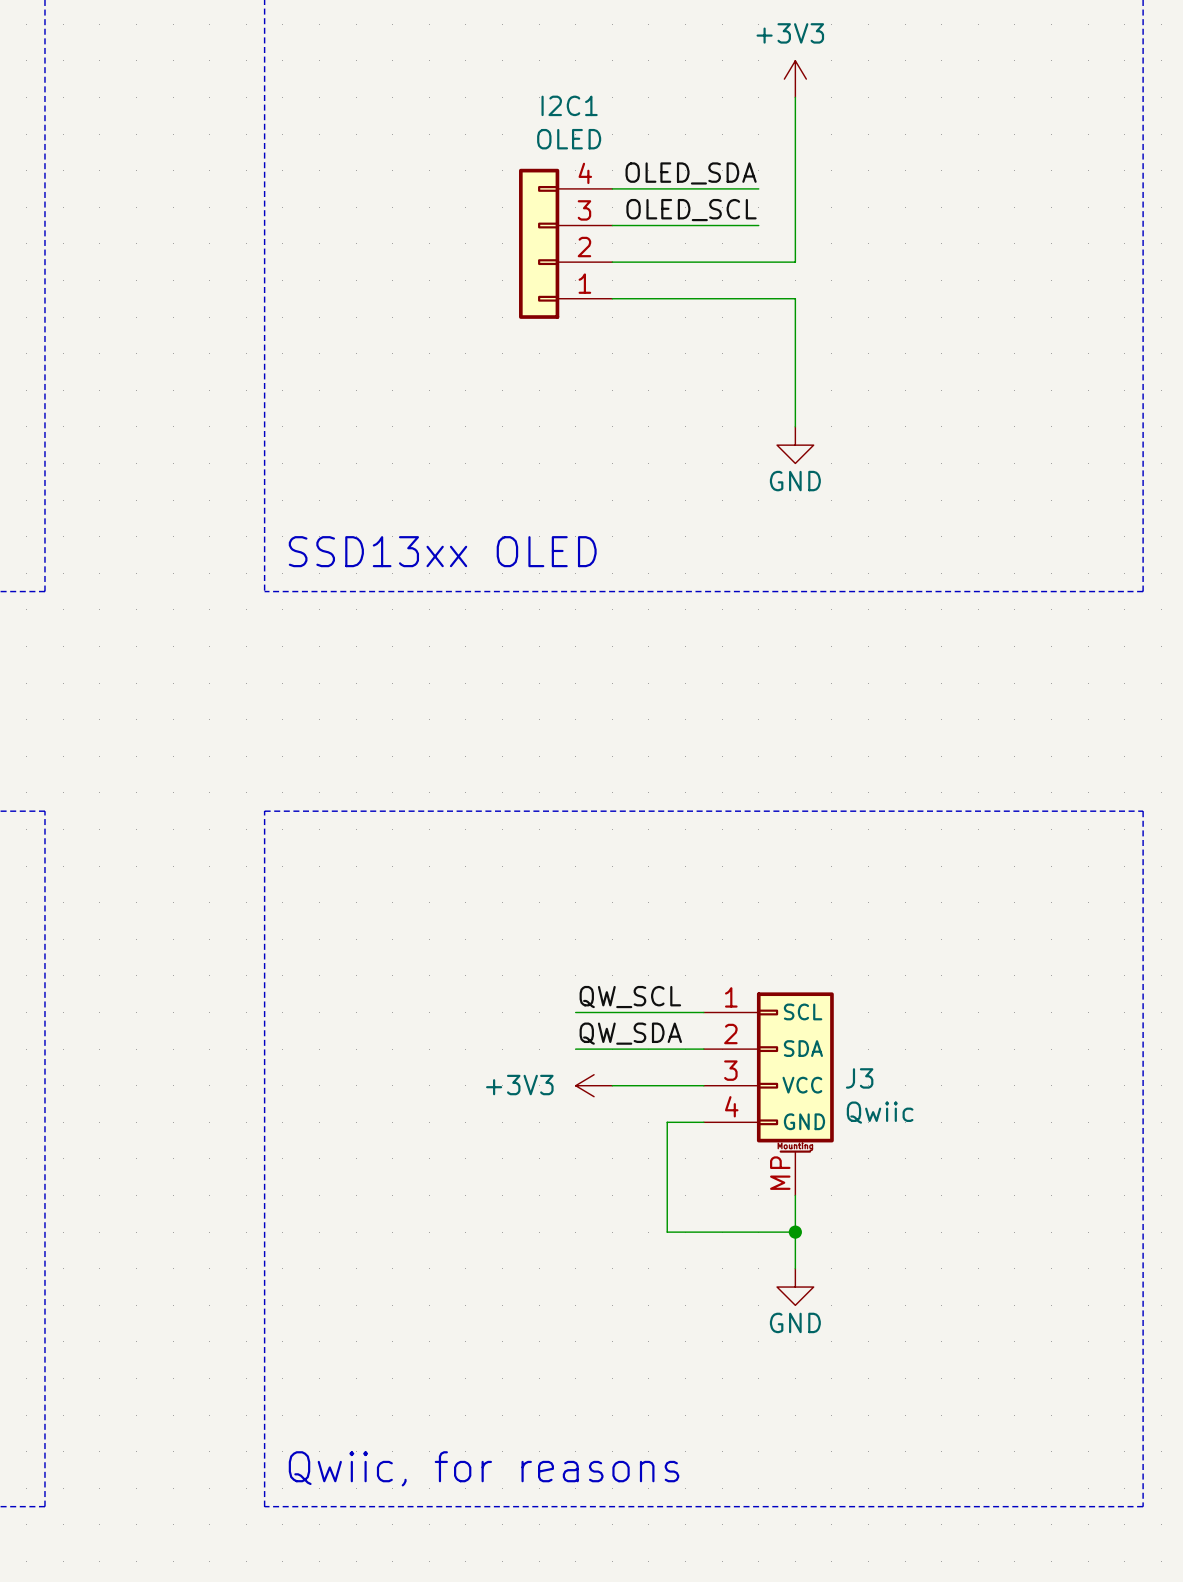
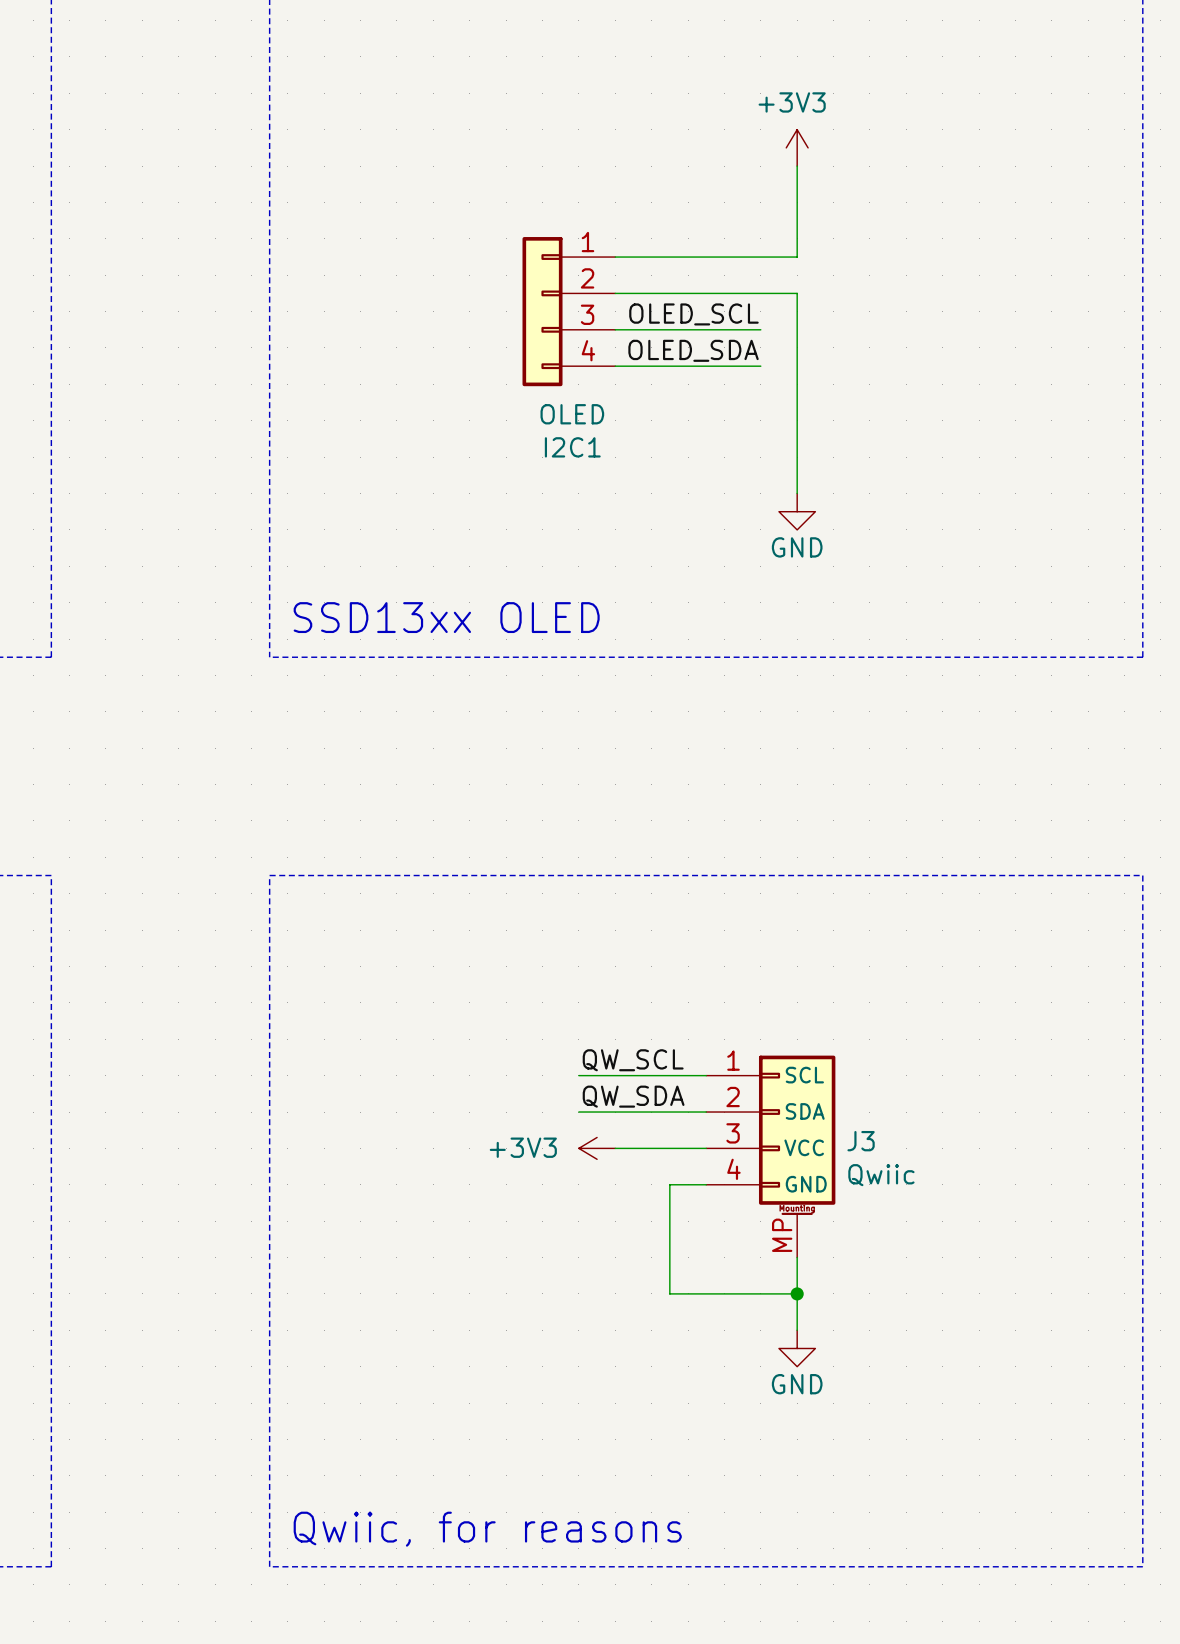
label position: OLED_SDA (691, 173) -> OLED_SDA (693, 350)
wire: (795, 188) (795, 225) -> (797, 257) (760, 257)
label position: OLED_SCL (691, 210) -> OLED_SCL (693, 314)
I2C1 flip: as is (539, 243) -> up-down (542, 311)
wire: (758, 262) (795, 262) -> (797, 366) (797, 329)
wire: (758, 298) (795, 298) -> (760, 293) (797, 293)

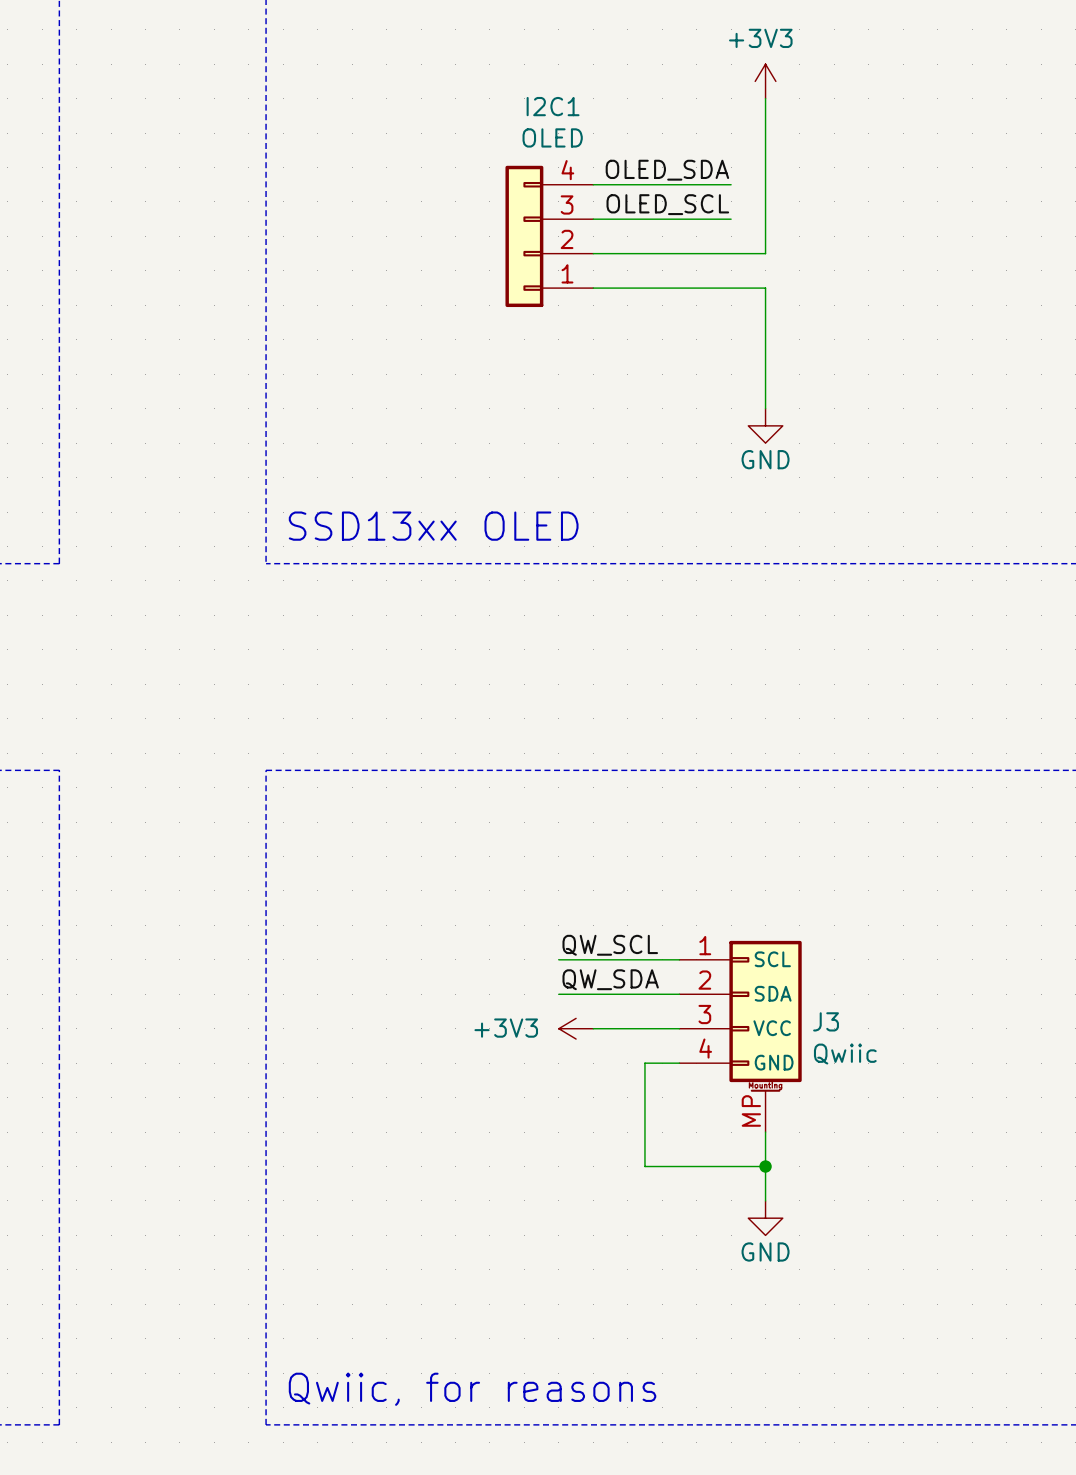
wire: (760, 257) (797, 257) -> (765, 219) (765, 184)
wire: (760, 293) (797, 293) -> (731, 288) (765, 288)
I2C1 flip: as is (542, 311) -> up-down (524, 236)
label position: OLED_SCL (693, 314) -> OLED_SCL (667, 204)
wire: (797, 329) (797, 366) -> (765, 253) (731, 253)
label position: OLED_SDA (693, 350) -> OLED_SDA (667, 170)

